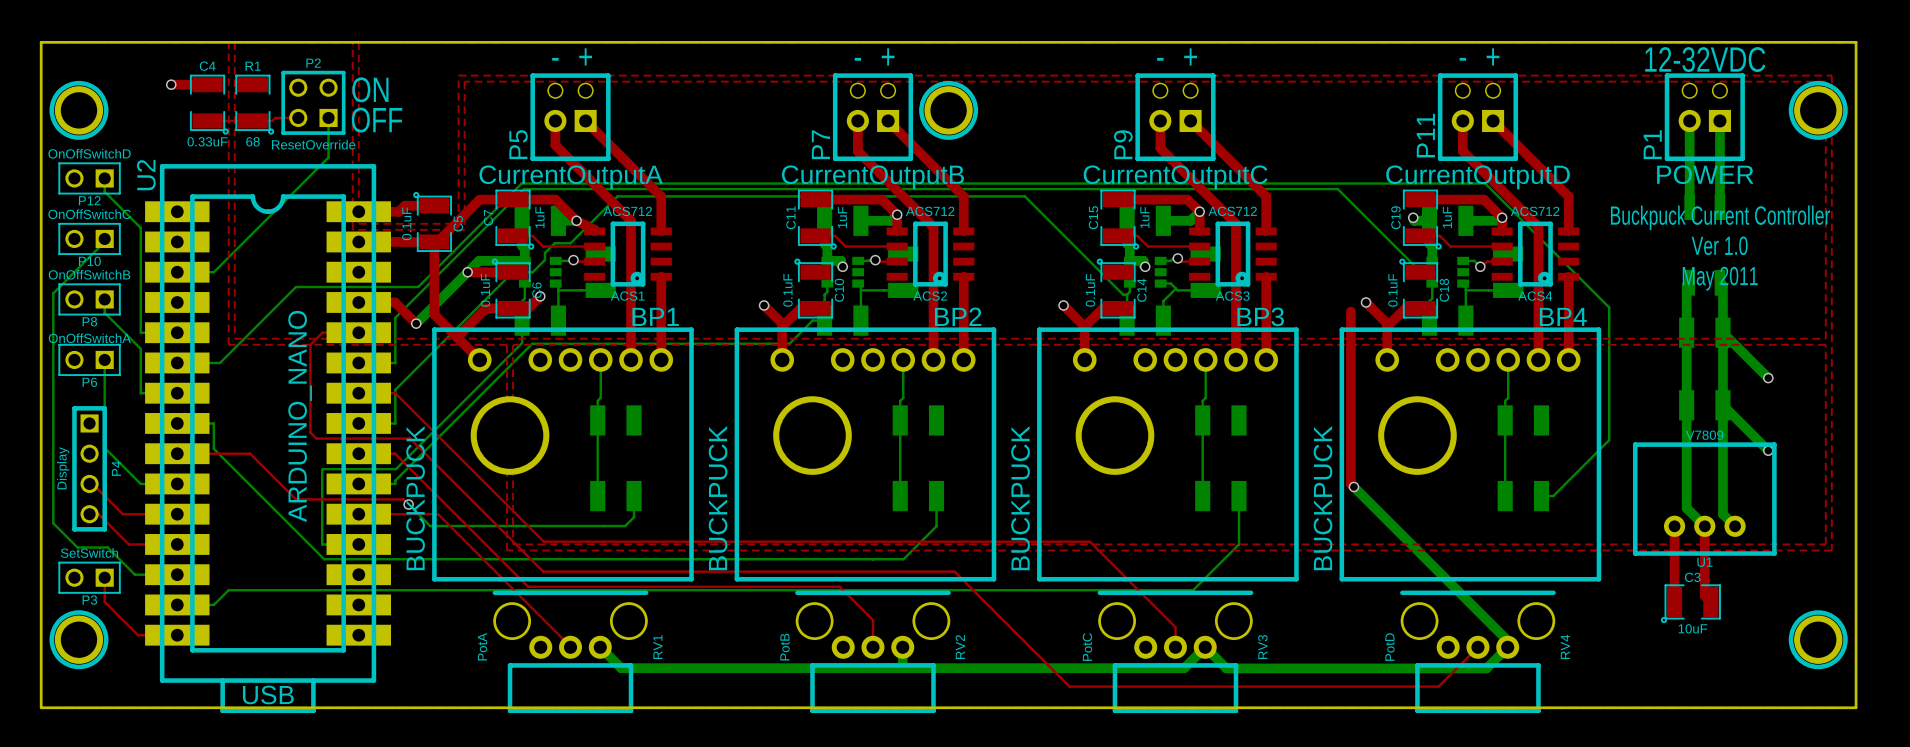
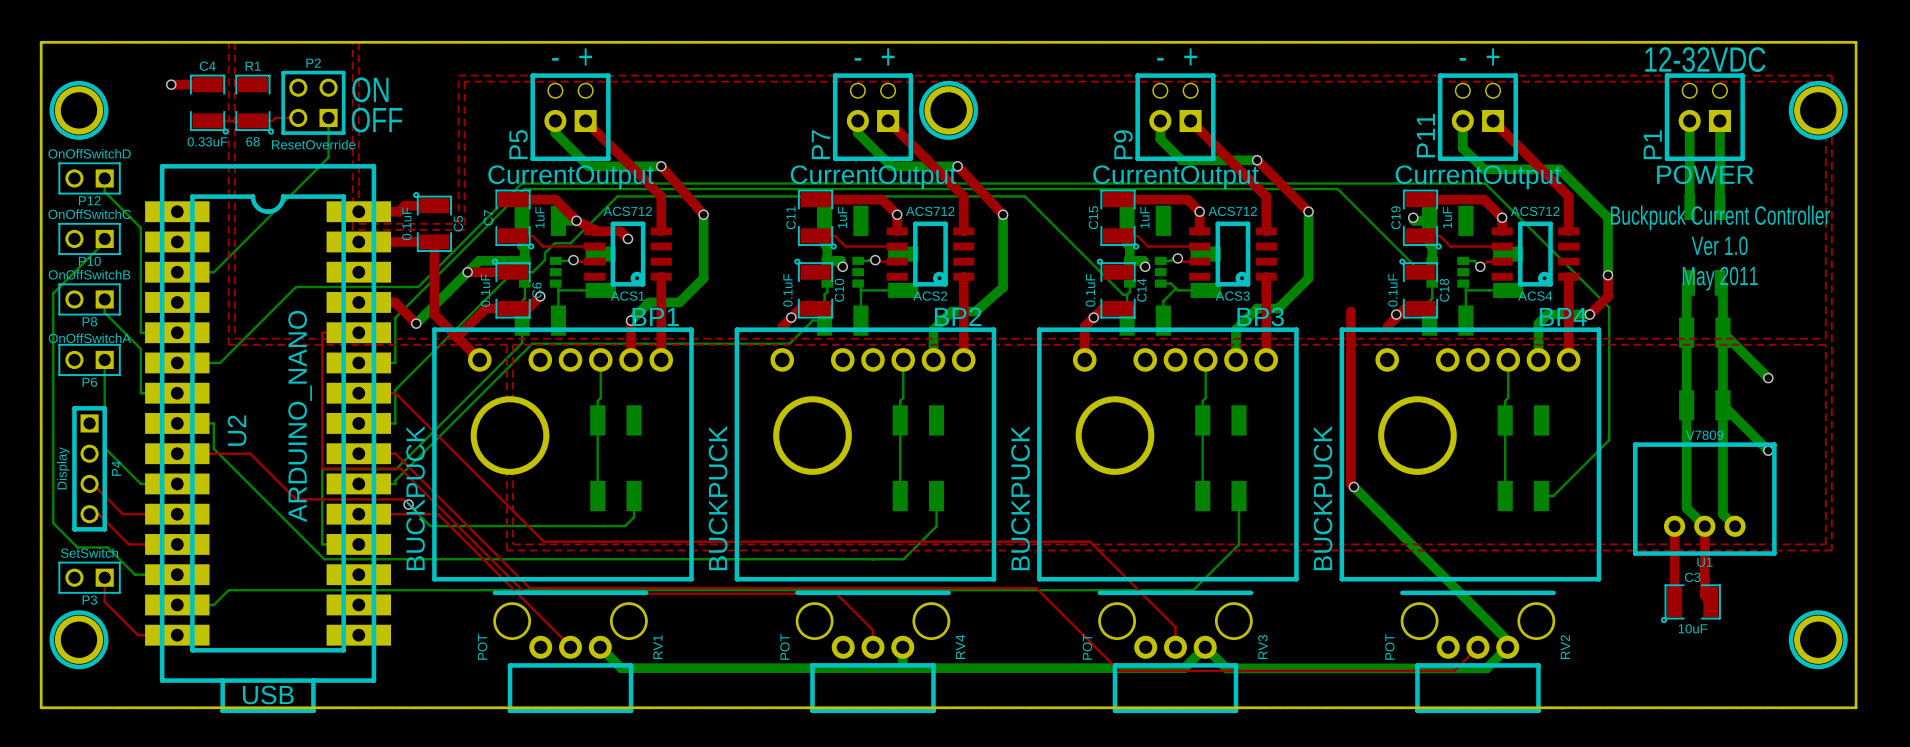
bottom track: none -> (555, 120) (555, 133) (588, 166) (661, 166)
top track: (555, 120) (555, 145) (631, 220) (631, 320) -> none
bottom track: none -> (857, 120) (857, 133) (891, 166) (957, 166)
top track: (857, 120) (857, 151) (933, 226) (933, 359) -> none
bottom track: none -> (1160, 120) (1160, 139) (1181, 160) (1257, 160)
top track: (1160, 120) (1160, 148) (1235, 223) (1235, 359) -> none
bottom track: none -> (1462, 120) (1462, 148) (1484, 169) (1559, 169) (1608, 217) (1608, 275)
top track: (1462, 120) (1462, 151) (1538, 226) (1538, 359) -> none
top track: none -> (1257, 160) (1308, 211)
via: none -> (1257, 160)
top track: none -> (661, 166) (703, 214)
via: none -> (661, 166)
top track: none -> (957, 166) (1003, 214)
via: none -> (957, 166)
U2 name position: U2 (146, 175) -> U2 (237, 430)
P5 value: CurrentOutputA (571, 177) -> CurrentOutput (571, 177)
P7 value: CurrentOutputB (872, 177) -> CurrentOutput (873, 177)
P9 value: CurrentOutputC (1175, 177) -> CurrentOutput (1176, 177)
P11 value: CurrentOutputD (1477, 177) -> CurrentOutput (1478, 177)
top track: (513, 199) (479, 199) (437, 241) (434, 241) -> none
bottom track: (1199, 211) (1190, 220) (1163, 220) -> none
bottom track: none -> (1308, 211) (1308, 278) (1278, 308) (1257, 308) (1235, 329) (1235, 359)
via: none -> (1308, 211)
bottom track: none -> (703, 214) (703, 278) (679, 302) (649, 302) (631, 320)
via: none -> (703, 214)
bottom track: (897, 214) (891, 220) (860, 220) -> none
bottom track: none -> (1003, 214) (1003, 287) (975, 311) (951, 311) (933, 329) (933, 359)
via: none -> (1003, 214)
bottom track: (1502, 217) (1499, 220) (1465, 220) -> none
top track: none -> (594, 231) (620, 231) (627, 238)
via: none -> (627, 238)
top track: none -> (1608, 275) (1608, 296) (1589, 314)
via: none -> (1608, 275)
top track: (1366, 302) (1387, 323) (1387, 359) -> none
via position: (1366, 302) -> (1396, 314)
top track: (764, 305) (782, 323) (782, 359) -> none
via position: (764, 305) -> (791, 317)
top track: (1063, 305) (1084, 326) -> none
via position: (1063, 305) -> (1093, 317)
bottom track: none -> (1589, 314) (1547, 314) (1538, 323) (1538, 359)
via: none -> (1589, 314)
via: none -> (631, 320)
top track: (322, 332) (310, 344) (310, 432) (316, 438) (410, 438) (543, 571) (954, 571) (1069, 686) (1438, 686) (1454, 670) -> (395, 453) (529, 588) (1036, 588) (1119, 670) (1454, 670)
top track: (395, 453) (528, 586) (839, 586) (872, 620) (872, 630) -> (322, 332) (322, 467) (400, 468) (525, 593) (836, 593) (872, 630)
RV1 value: PotA (482, 646) -> POT (482, 646)
RV4 name: RV4 (1565, 646) -> RV2 (1565, 647)
RV2 value: PotB (785, 647) -> POT (784, 646)
RV2 name: RV2 (960, 647) -> RV4 (960, 646)
RV3 value: PotC (1087, 647) -> POT (1087, 646)
RV4 value: PotD (1389, 647) -> POT (1389, 646)

